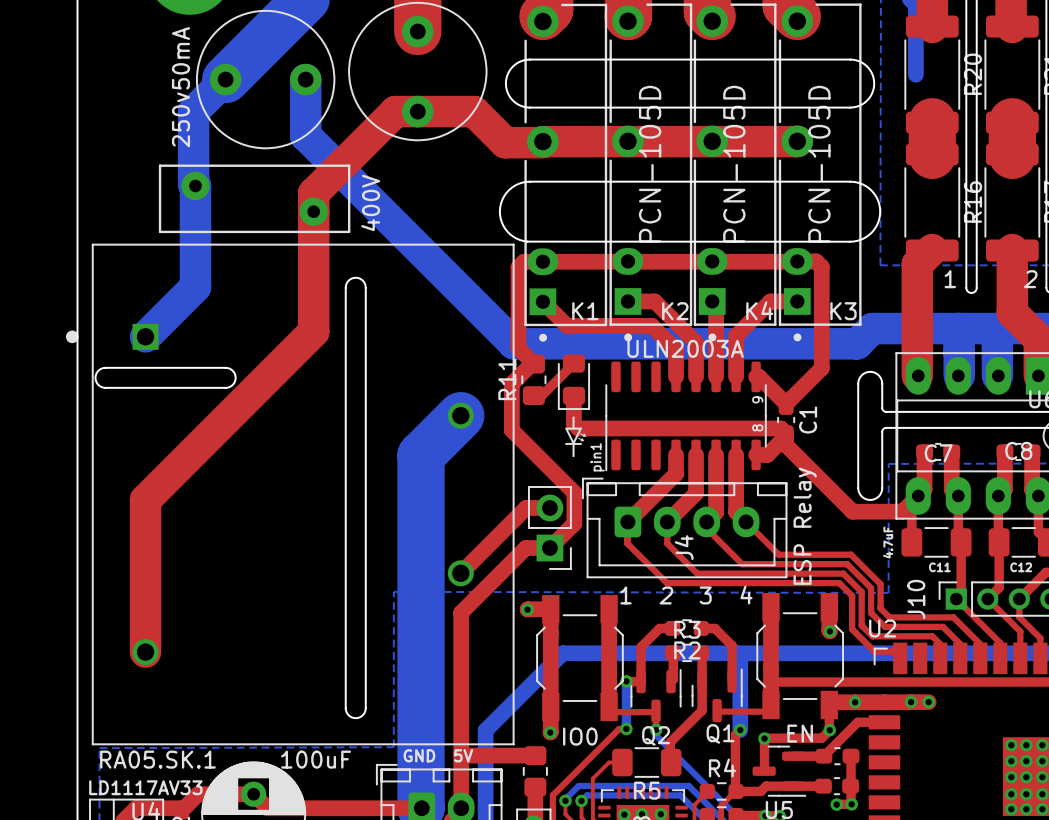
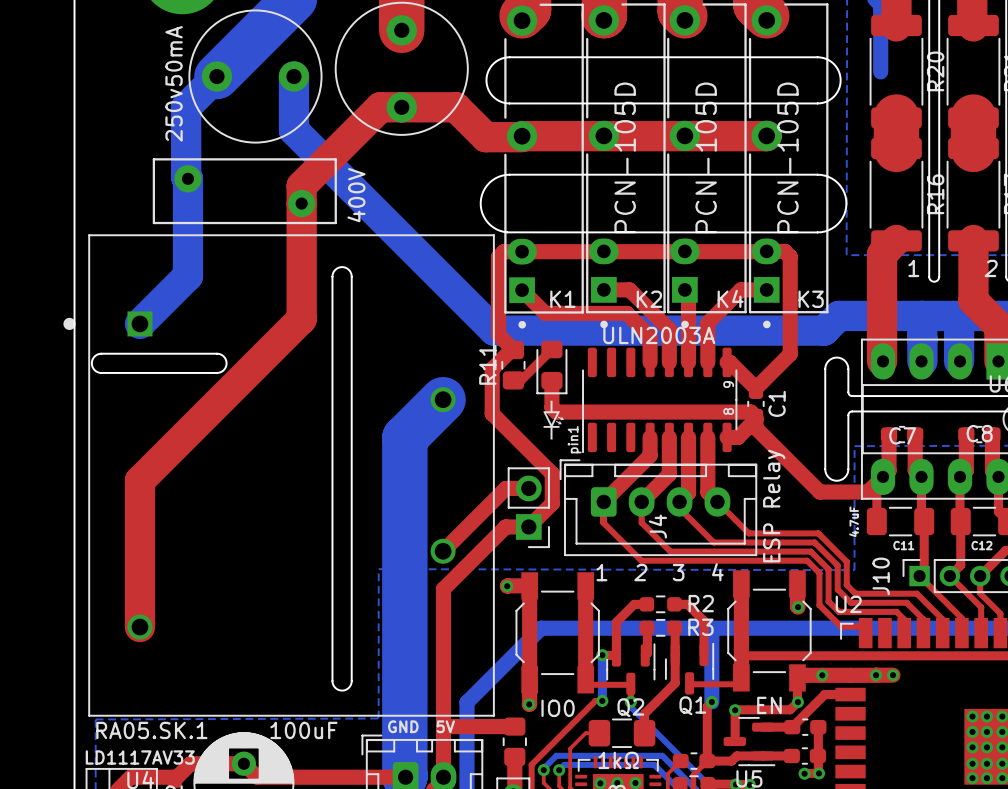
R3 name position: R3 (687, 629) -> R3 (700, 627)
R2 name position: R2 (687, 650) -> R2 (701, 603)
R5: (646, 762) -> none
part: none -> 1kΩ (622, 733)
R4: (721, 791) -> none
part: none -> (693, 761)

